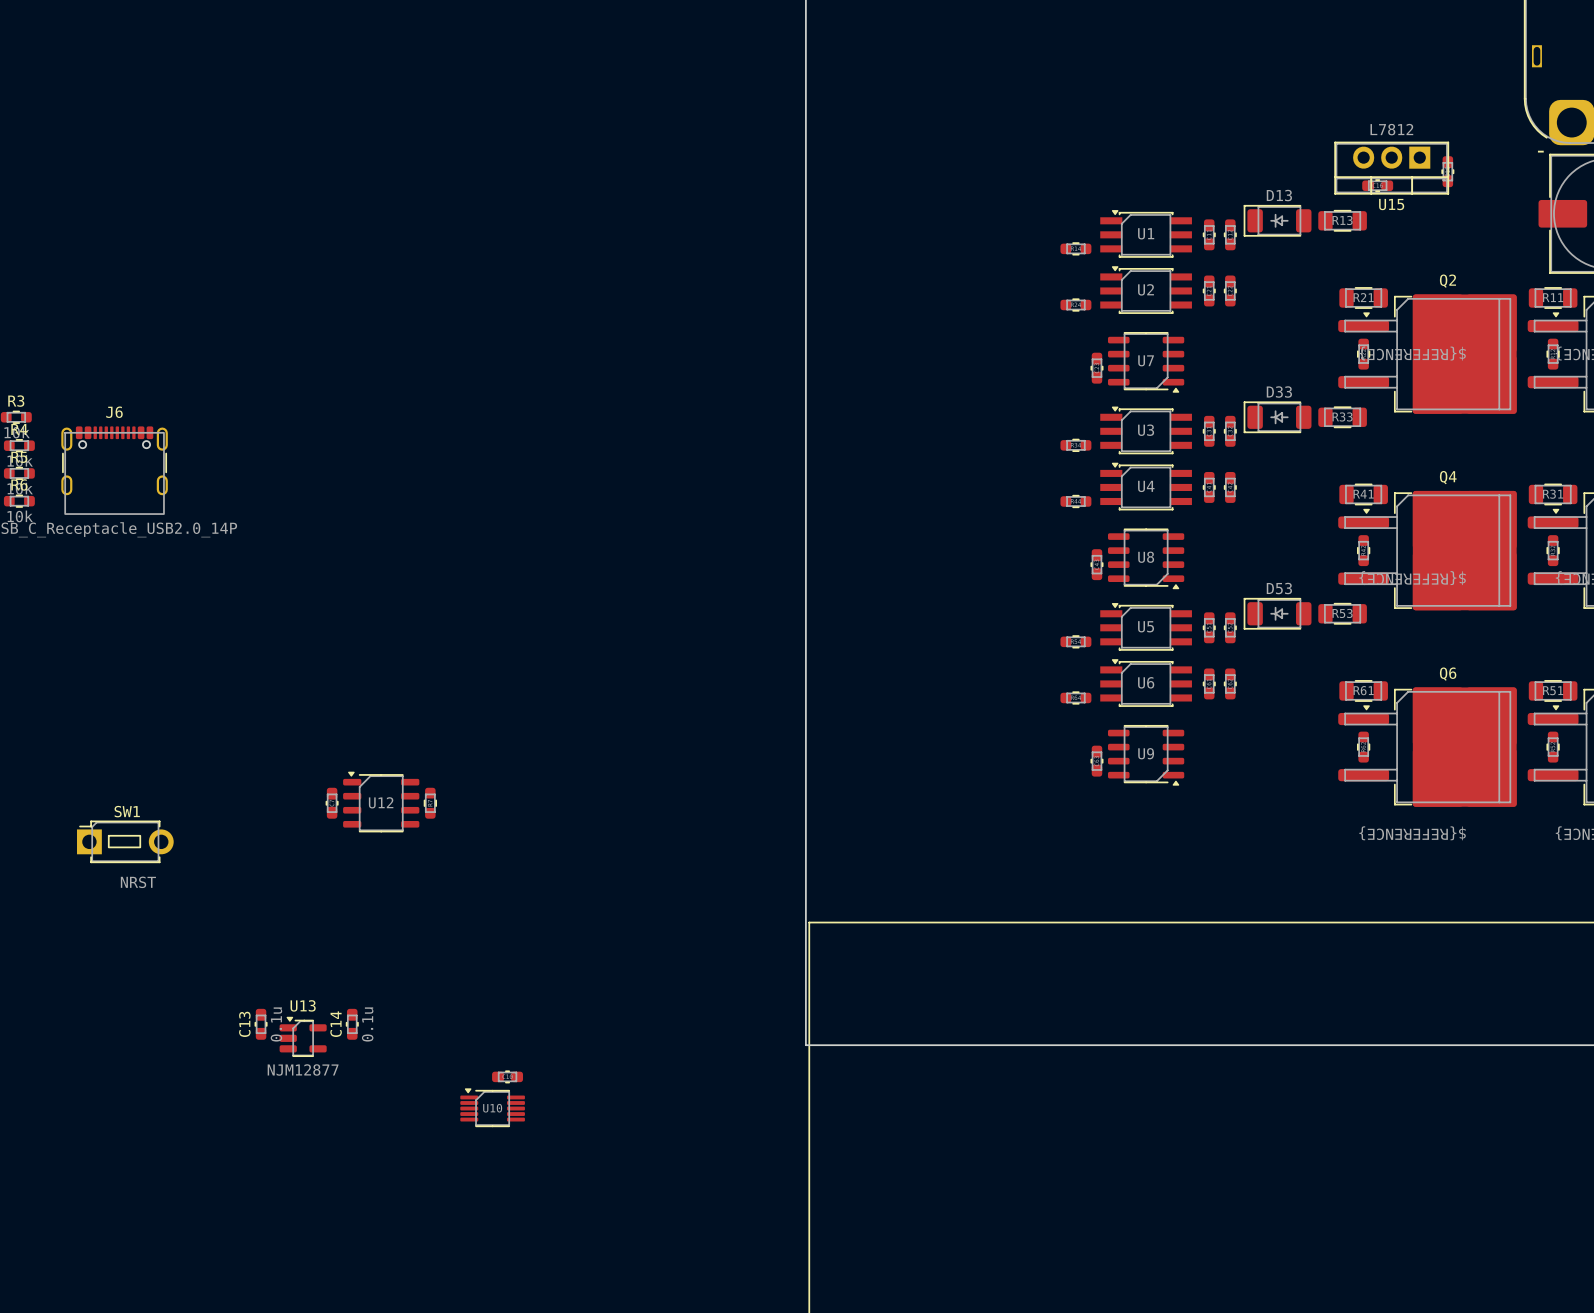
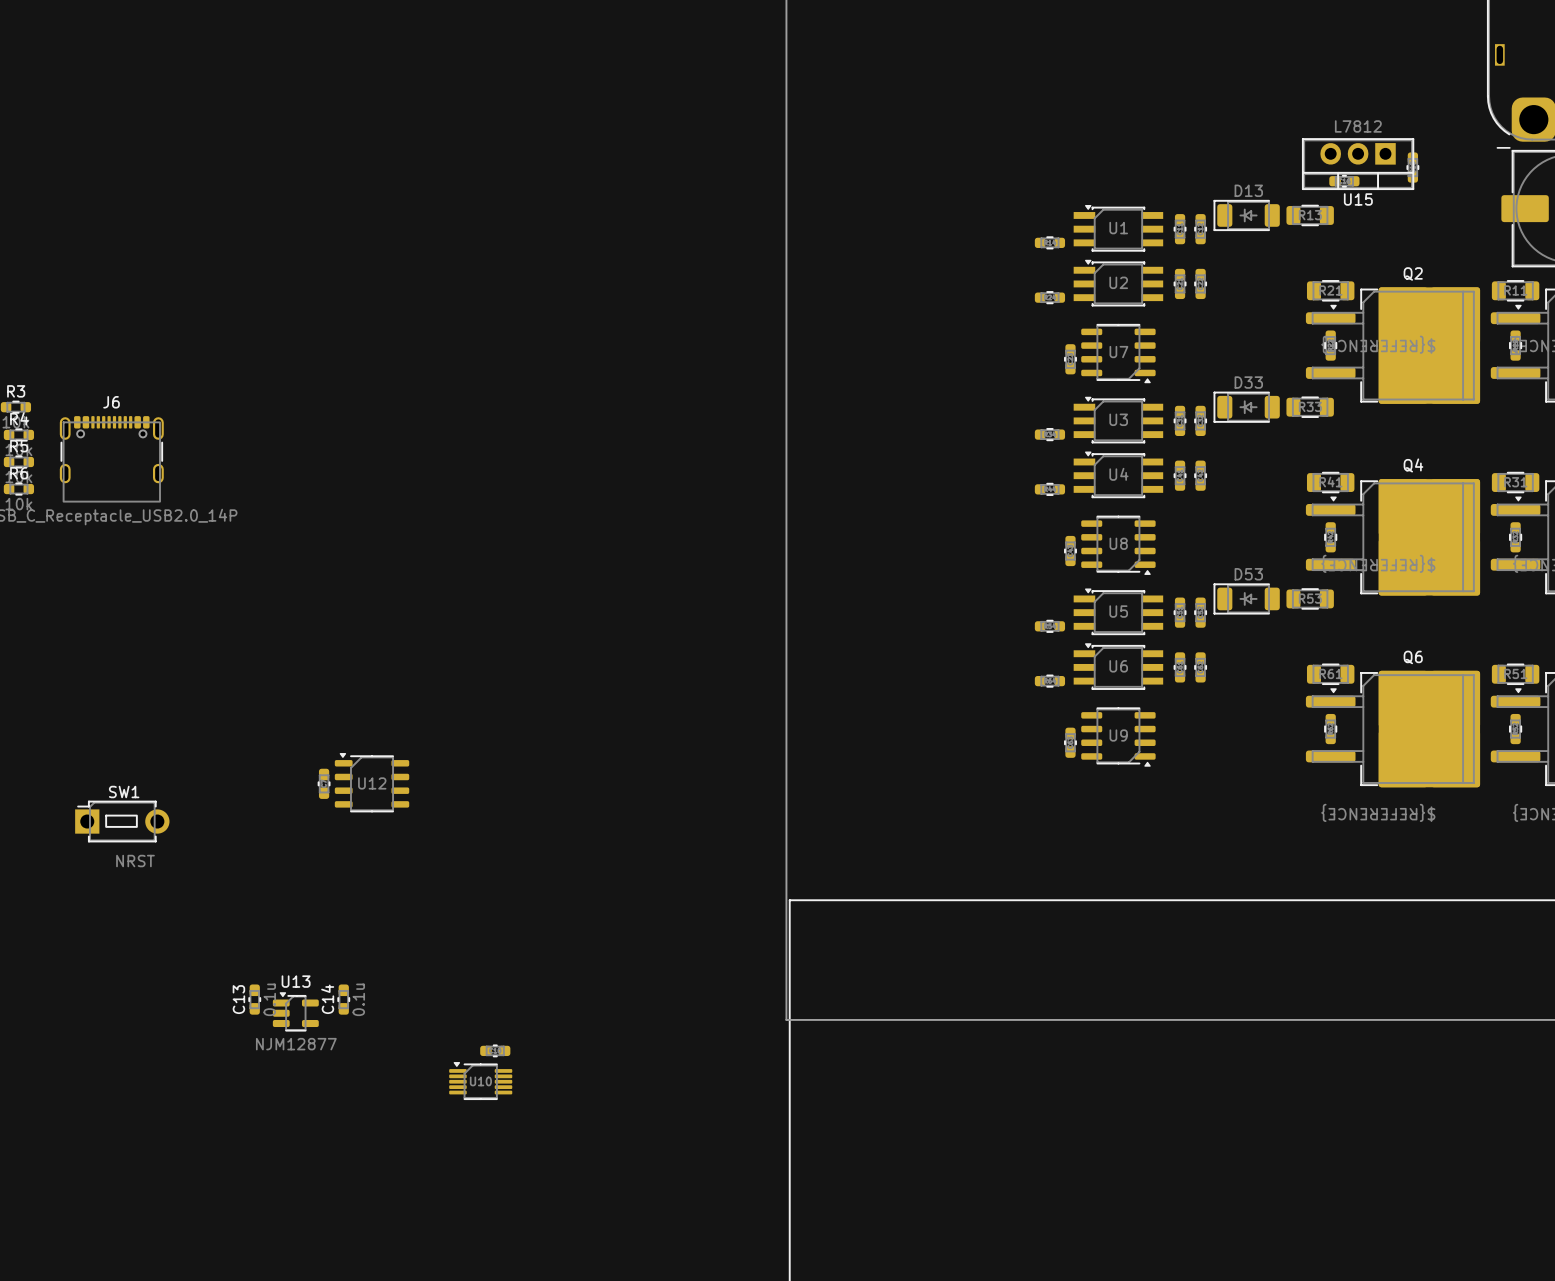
part: (430, 803) -> none

